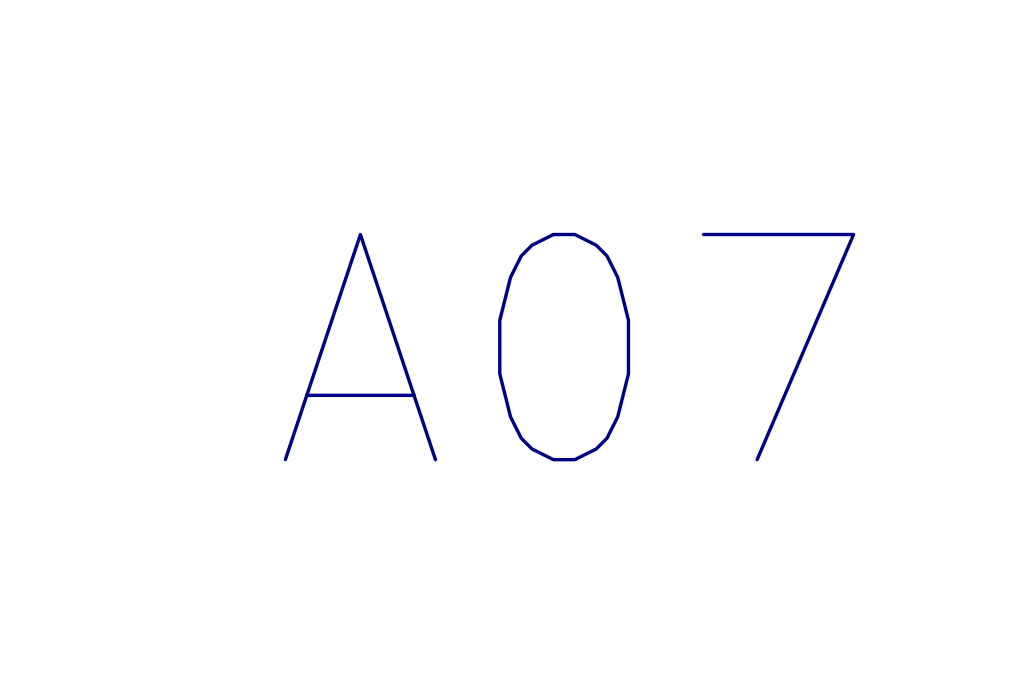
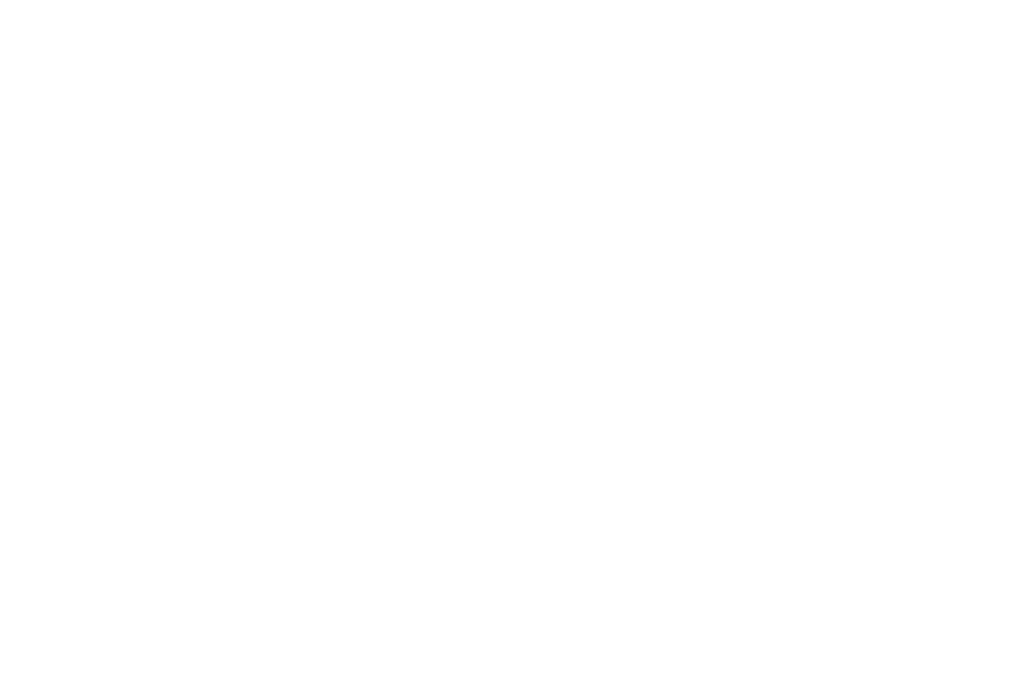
text: A07 (569, 347) -> none

